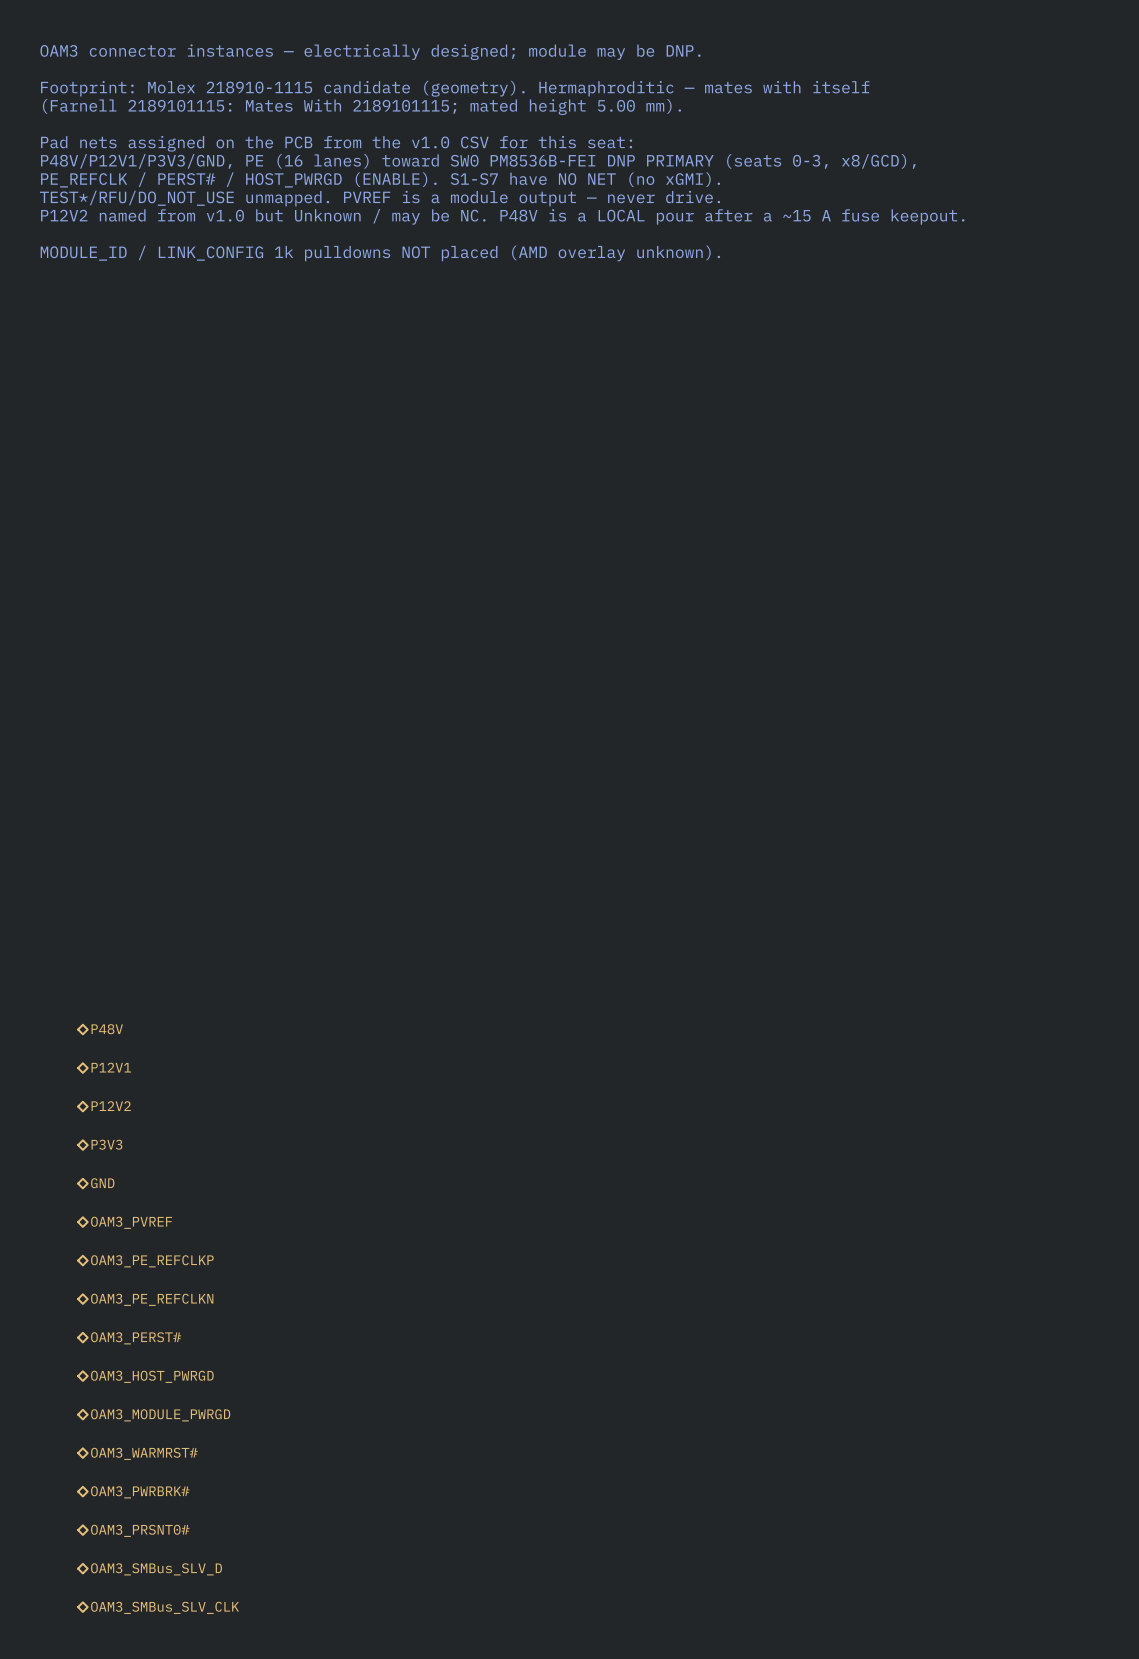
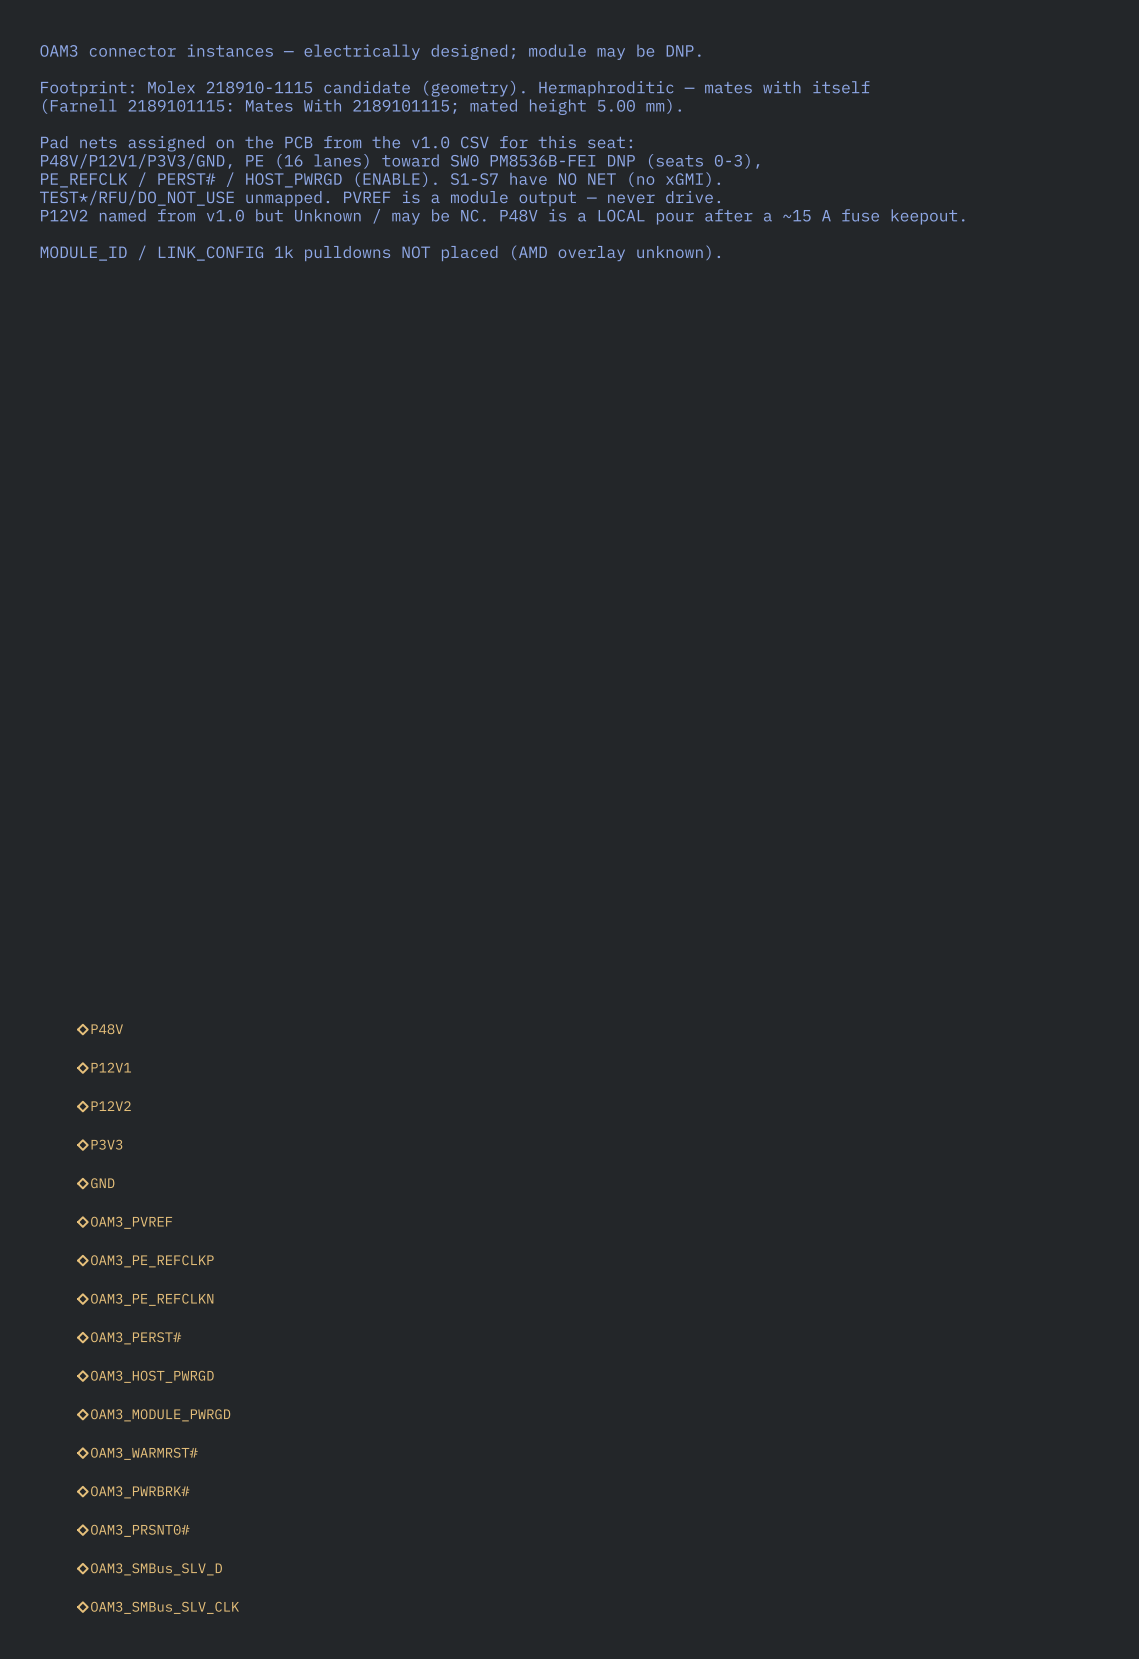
text: P48V/P12V1/P3V3/GND, PE (16 lanes) toward SW0 PM8536B-FEI DNP PRIMARY (seats 0-3, x8/GCD), (478, 161) -> P48V/P12V1/P3V3/GND, PE (16 lanes) toward SW0 PM8536B-FEI DNP (seats 0-3), (400, 161)

